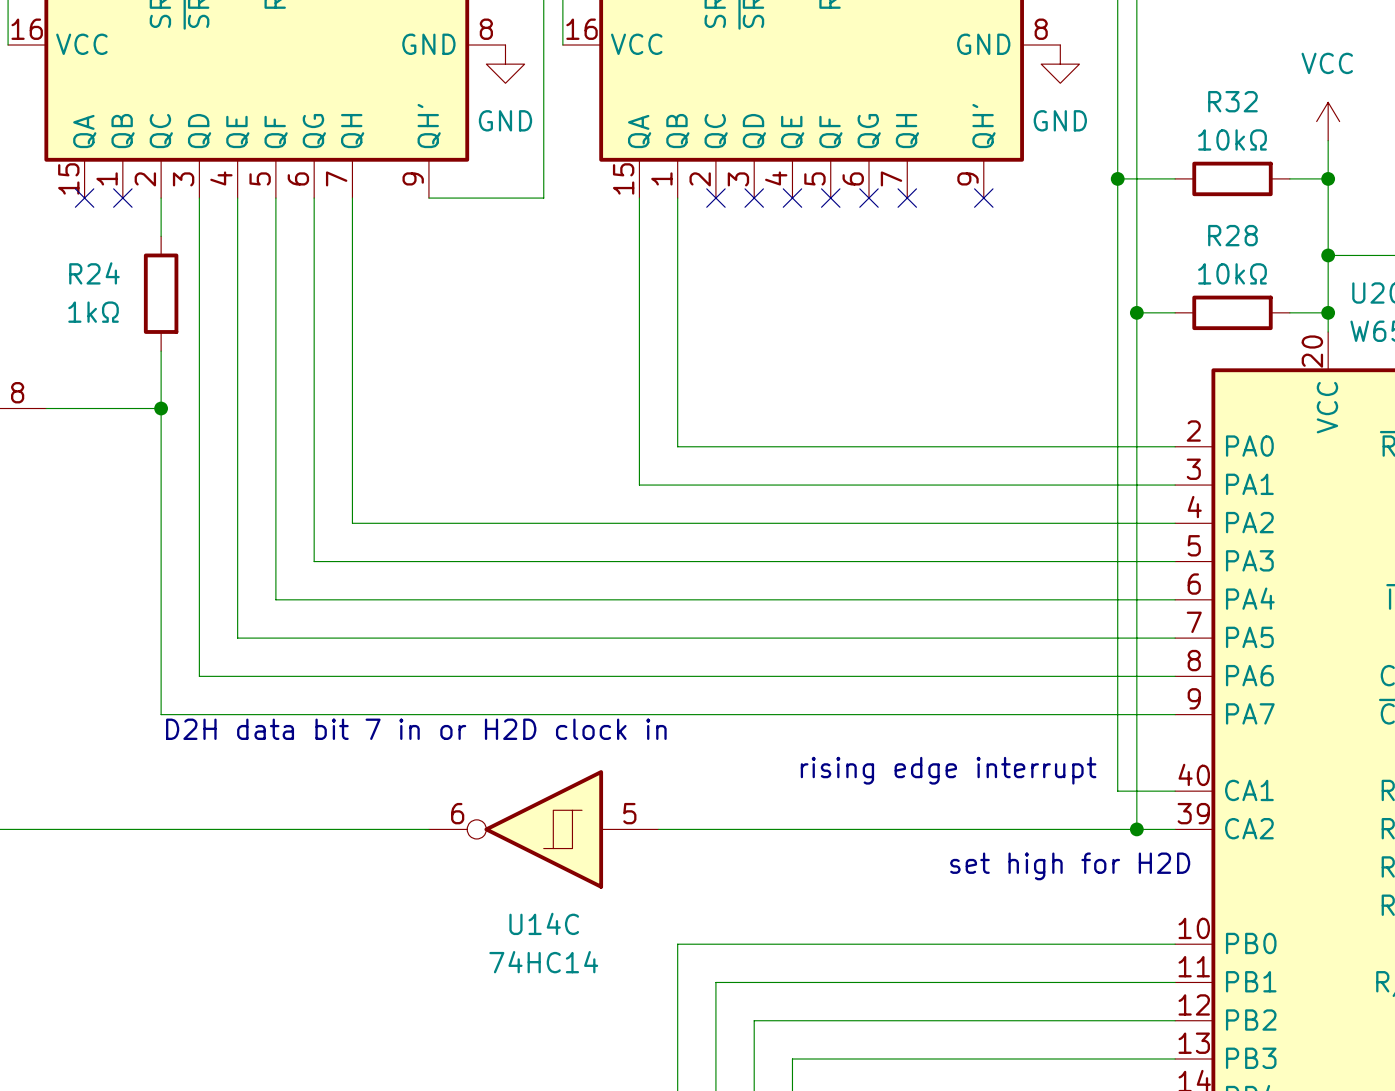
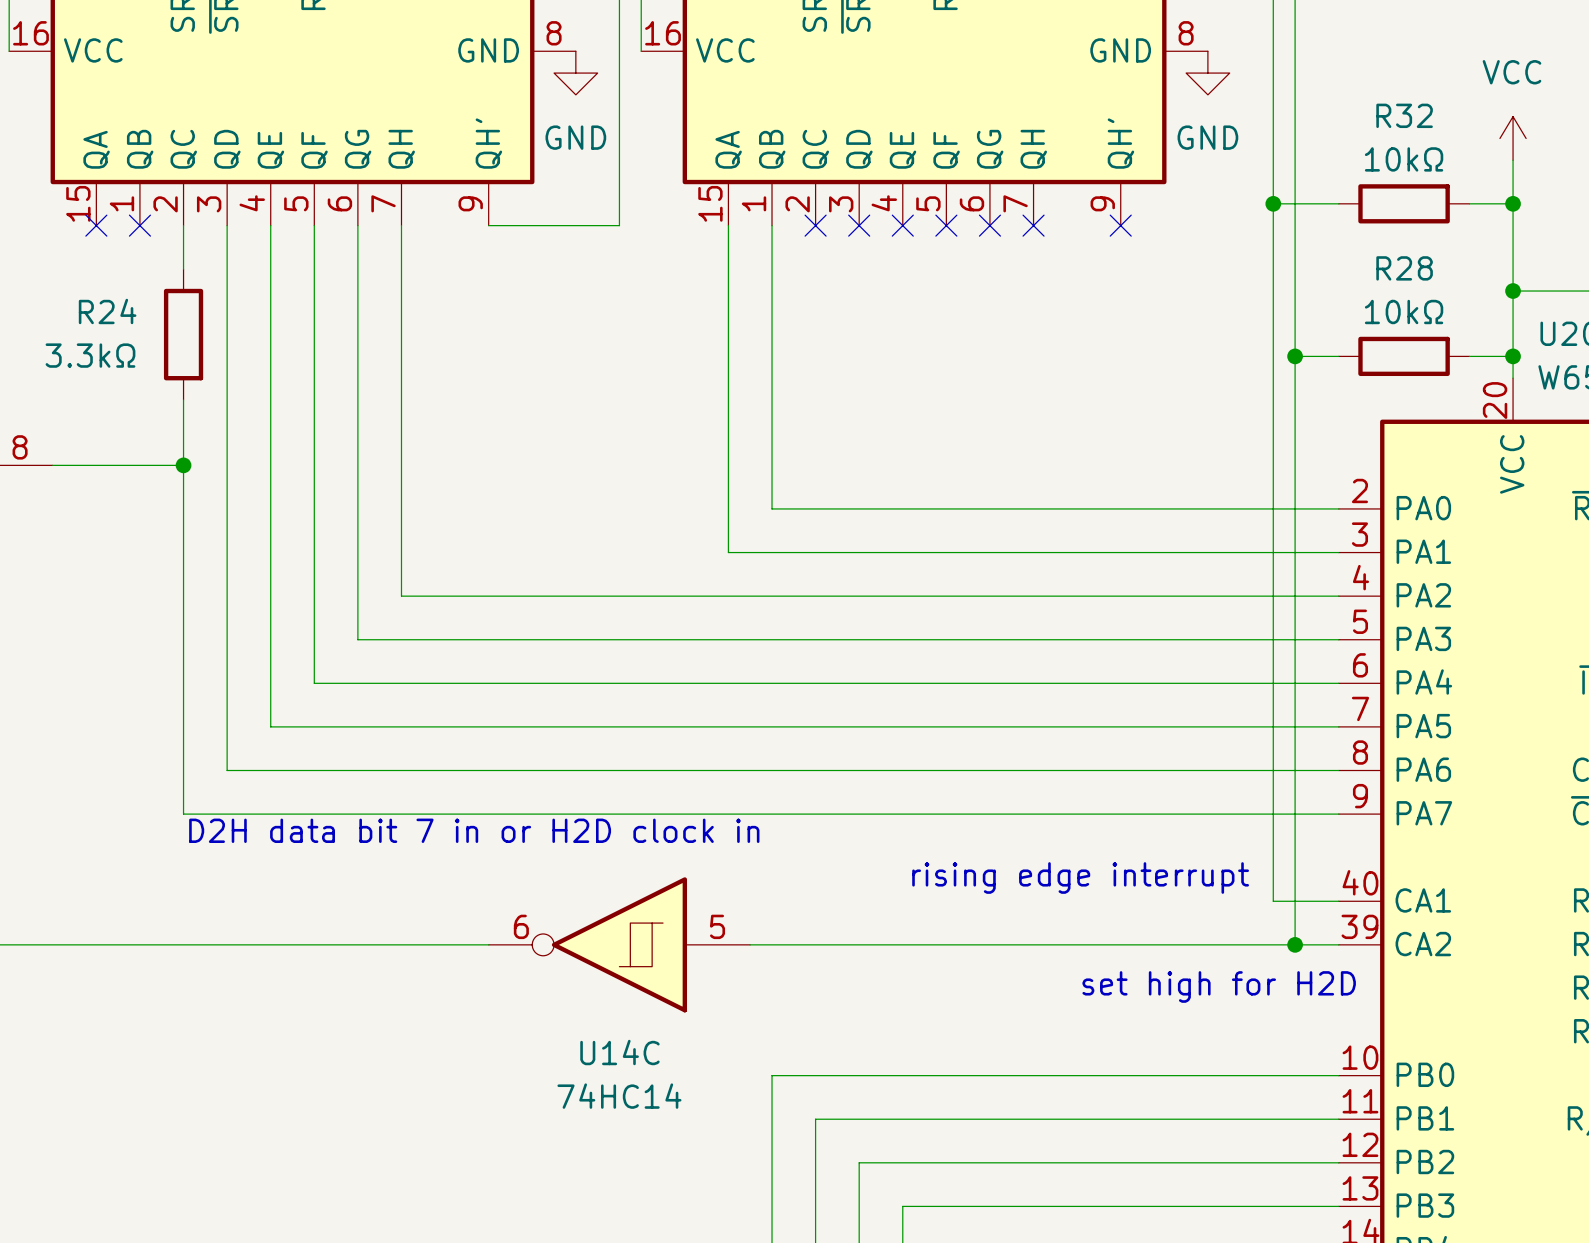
R24 value: 1kΩ (93, 312) -> 3.3kΩ (90, 355)

